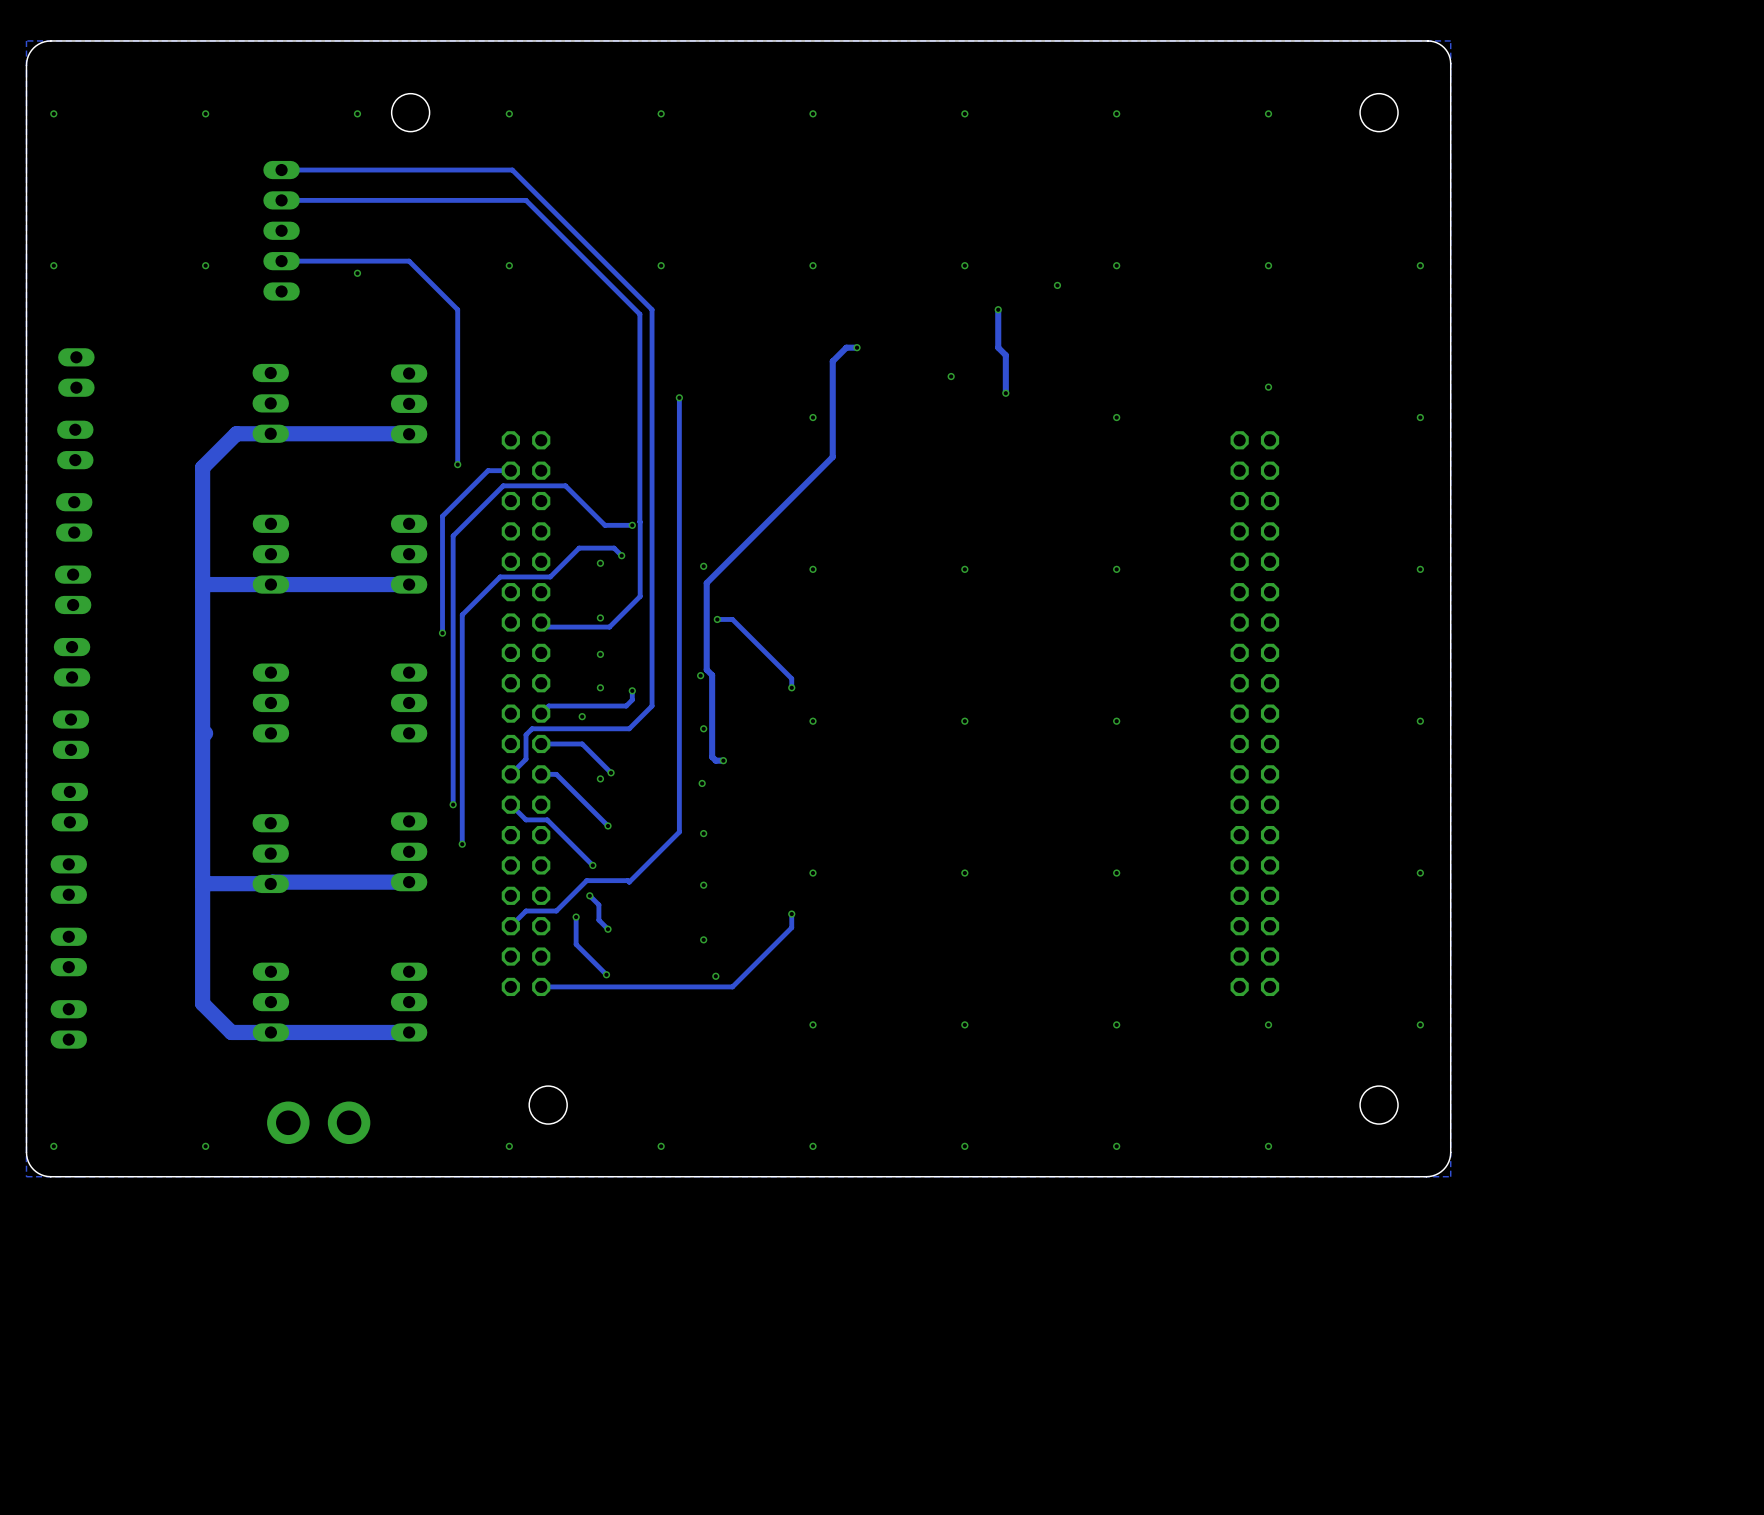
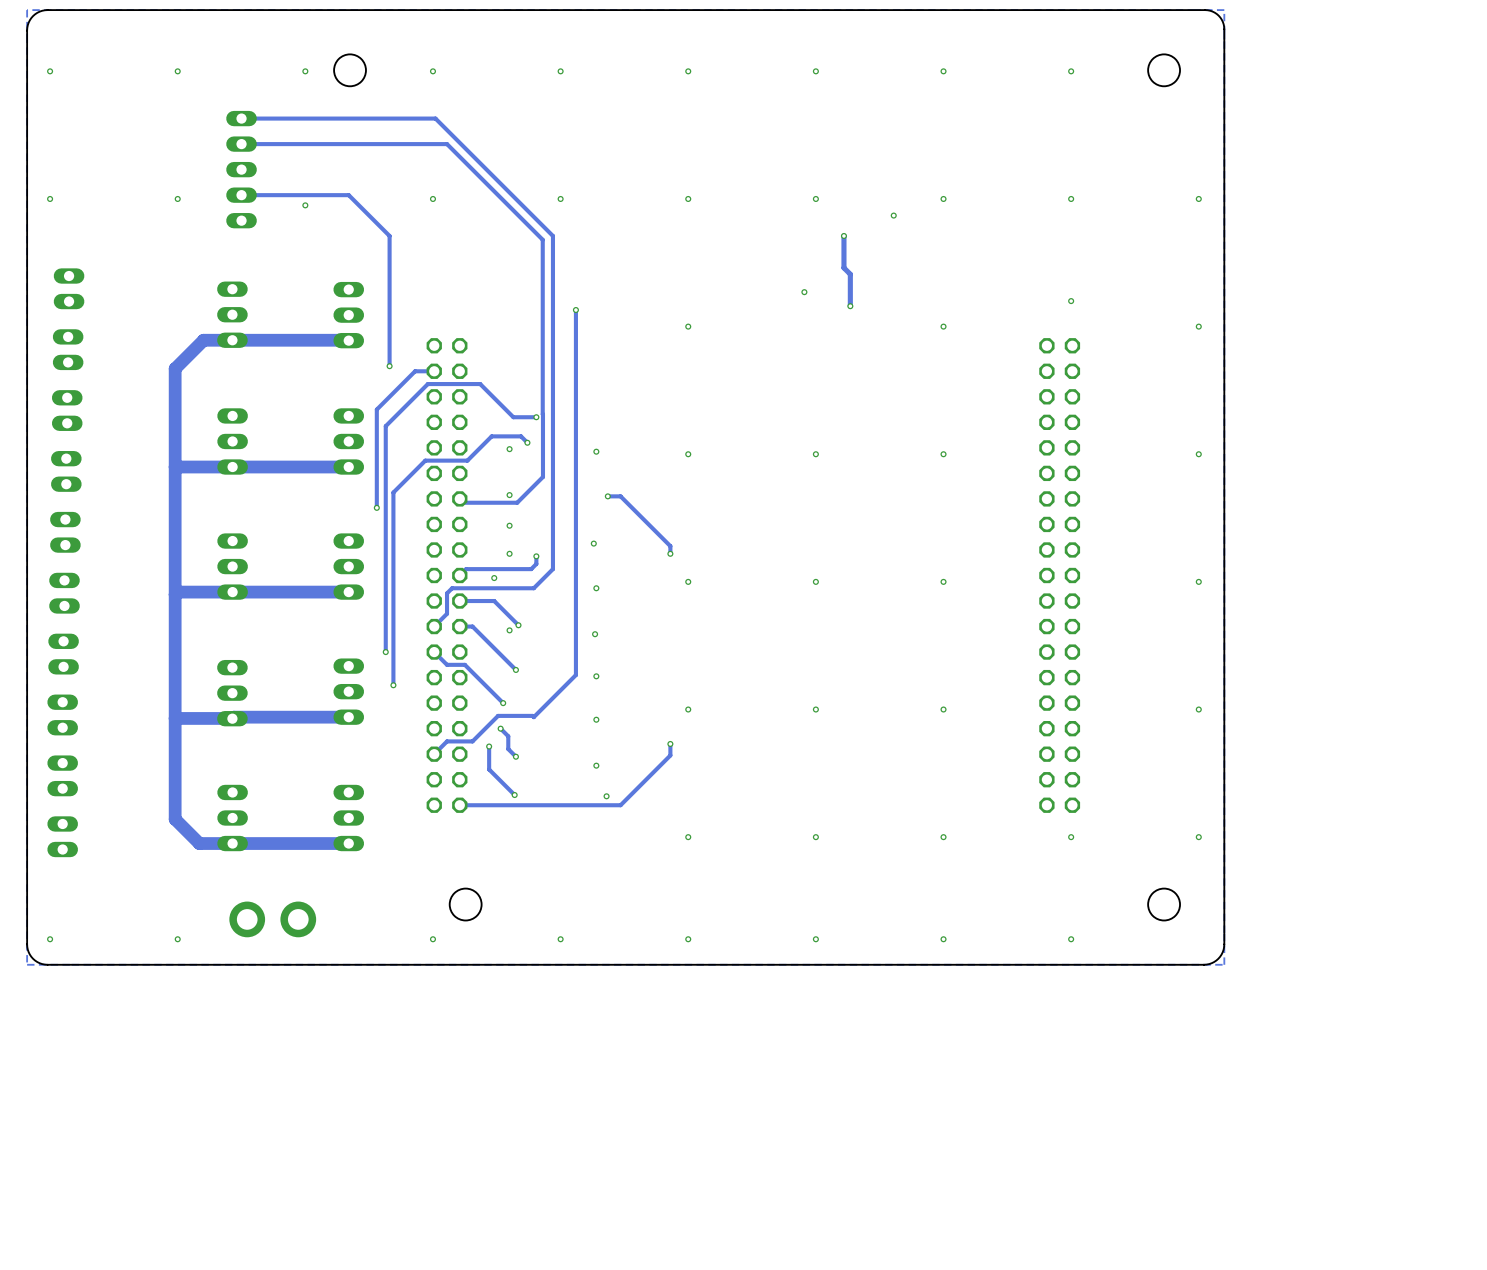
track: (857, 347) (846, 347) (832, 361) (832, 457) (706, 583) (706, 669) (712, 675) (712, 757) (715, 760) (723, 760) -> none
via: (857, 347) -> none
track: none -> (348, 592) (177, 592)
via: (723, 760) -> none

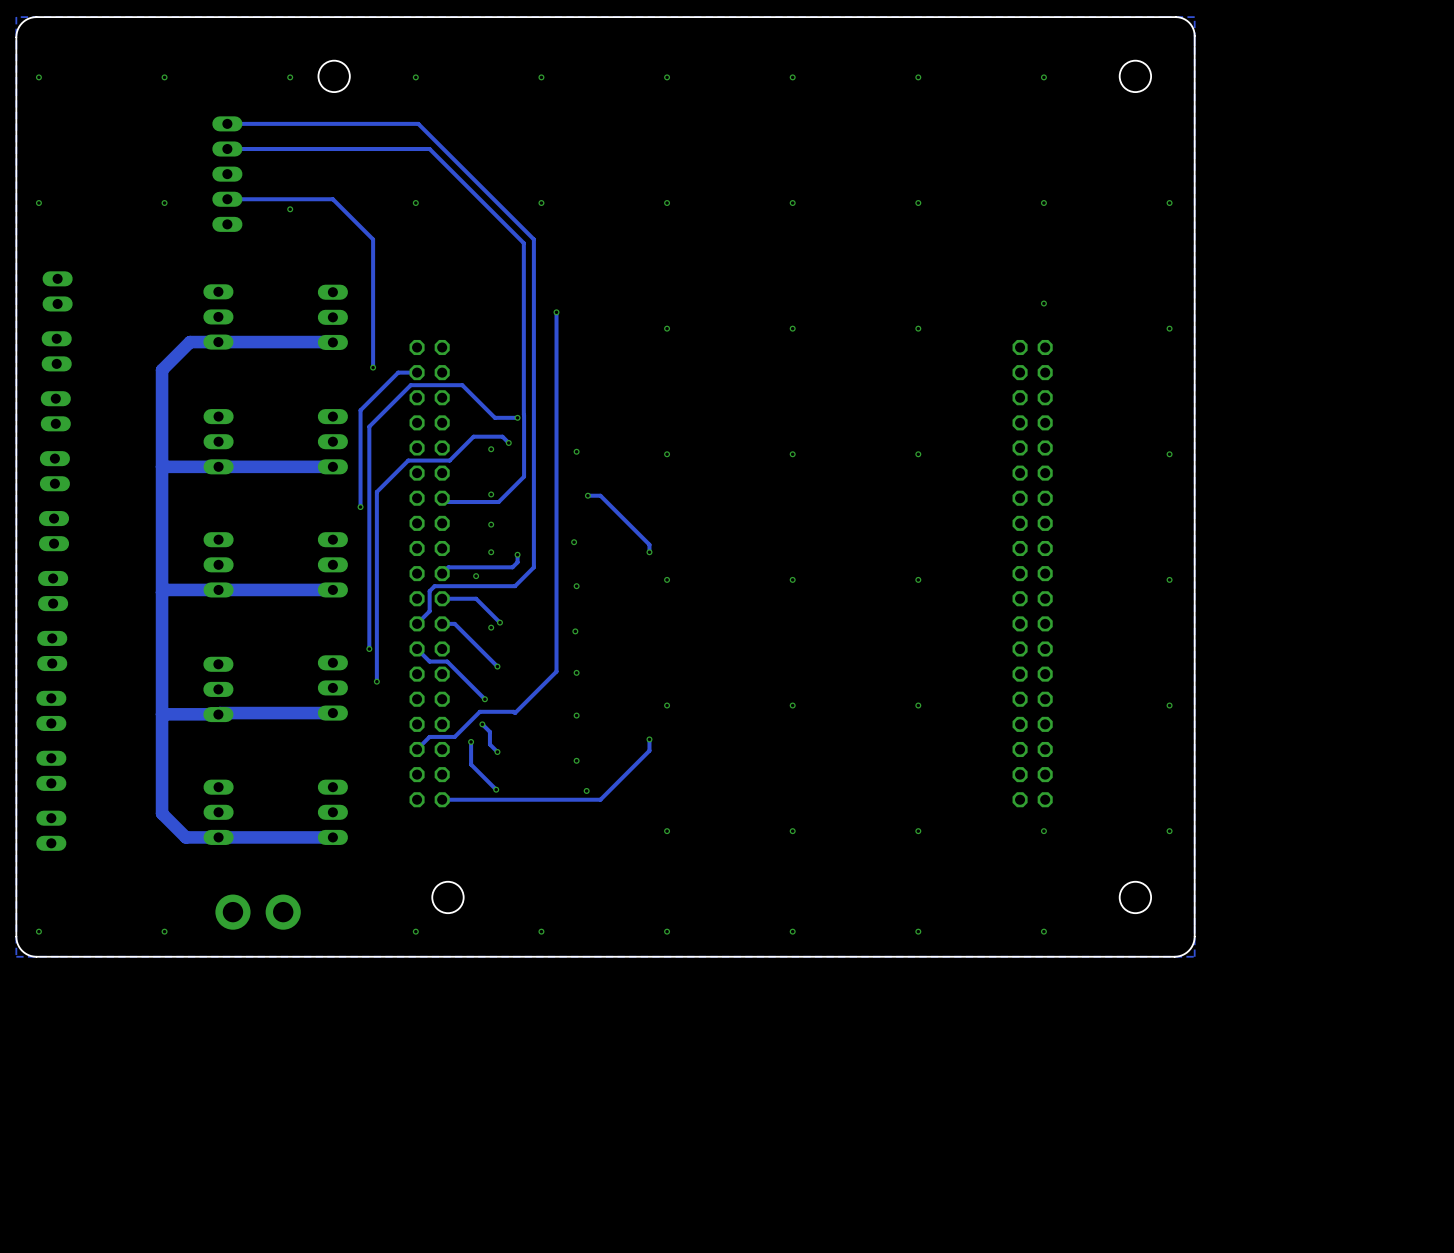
via: (893, 215) -> none
track: (843, 235) (843, 267) (850, 274) (850, 306) -> none
via: (843, 235) -> none
via: (804, 292) -> none
via: (850, 306) -> none
via: none -> (792, 328)

